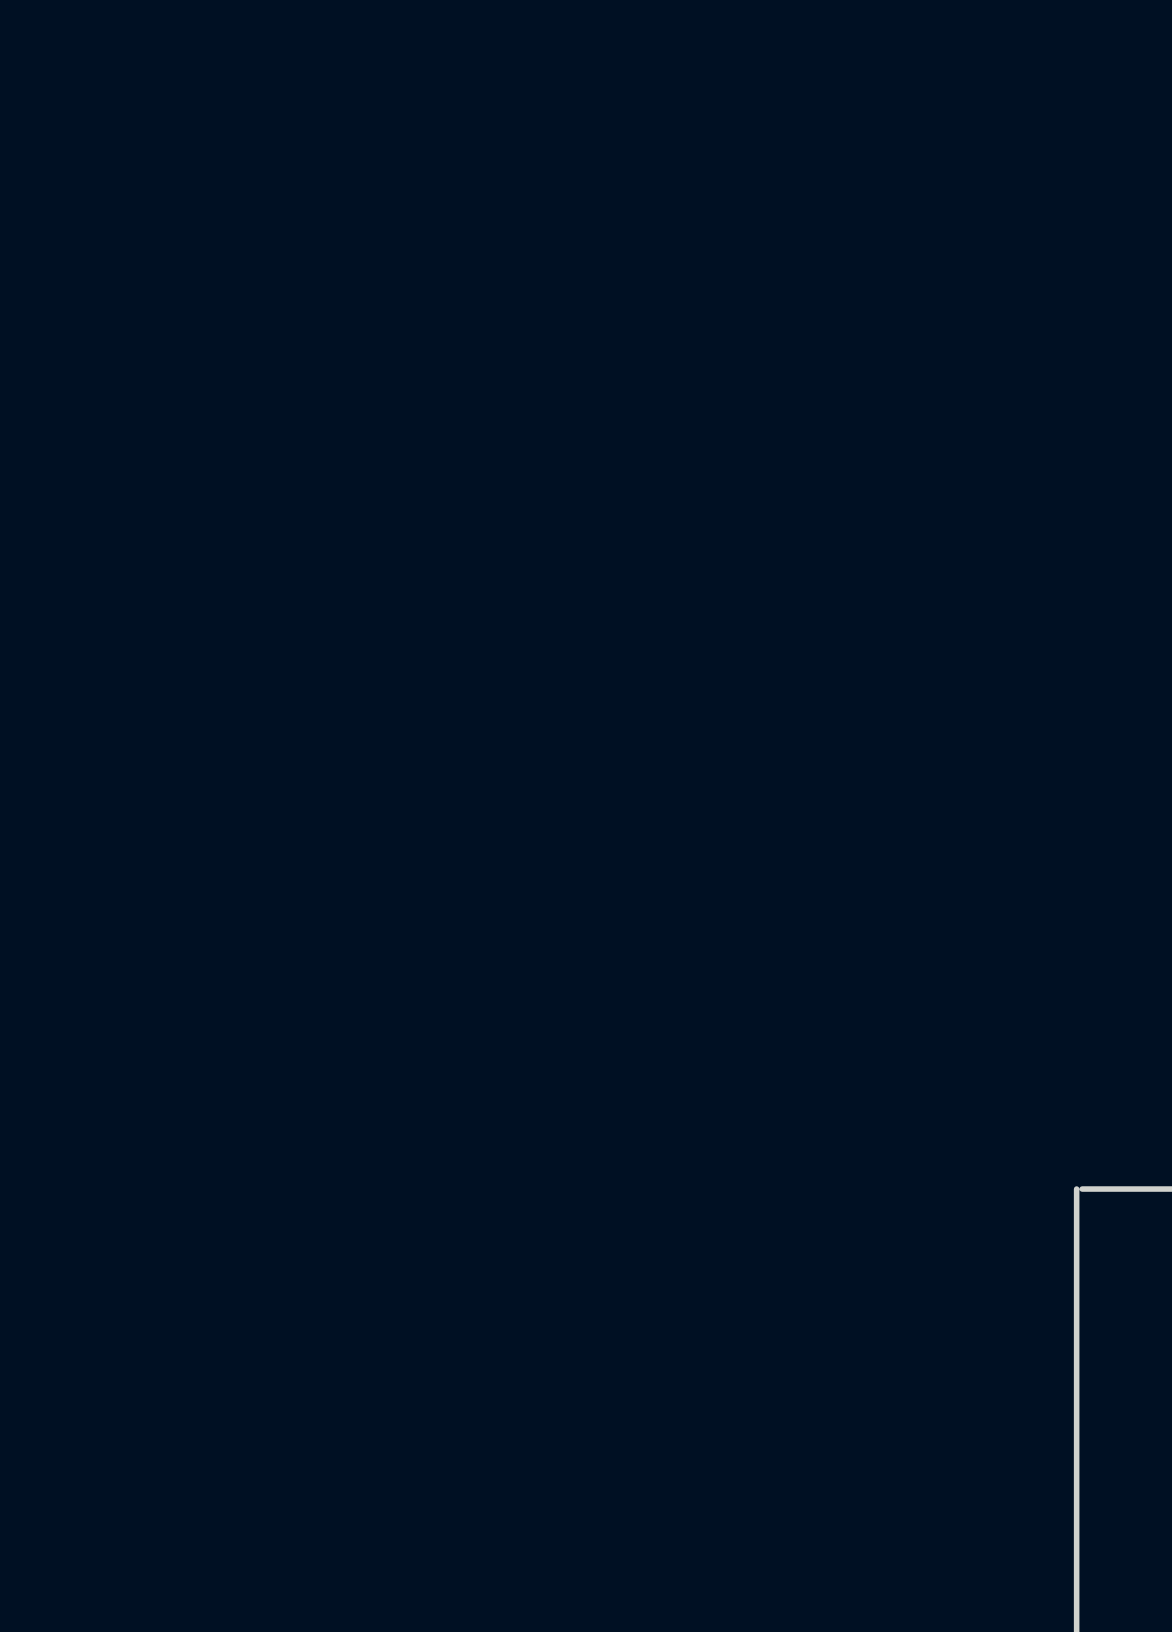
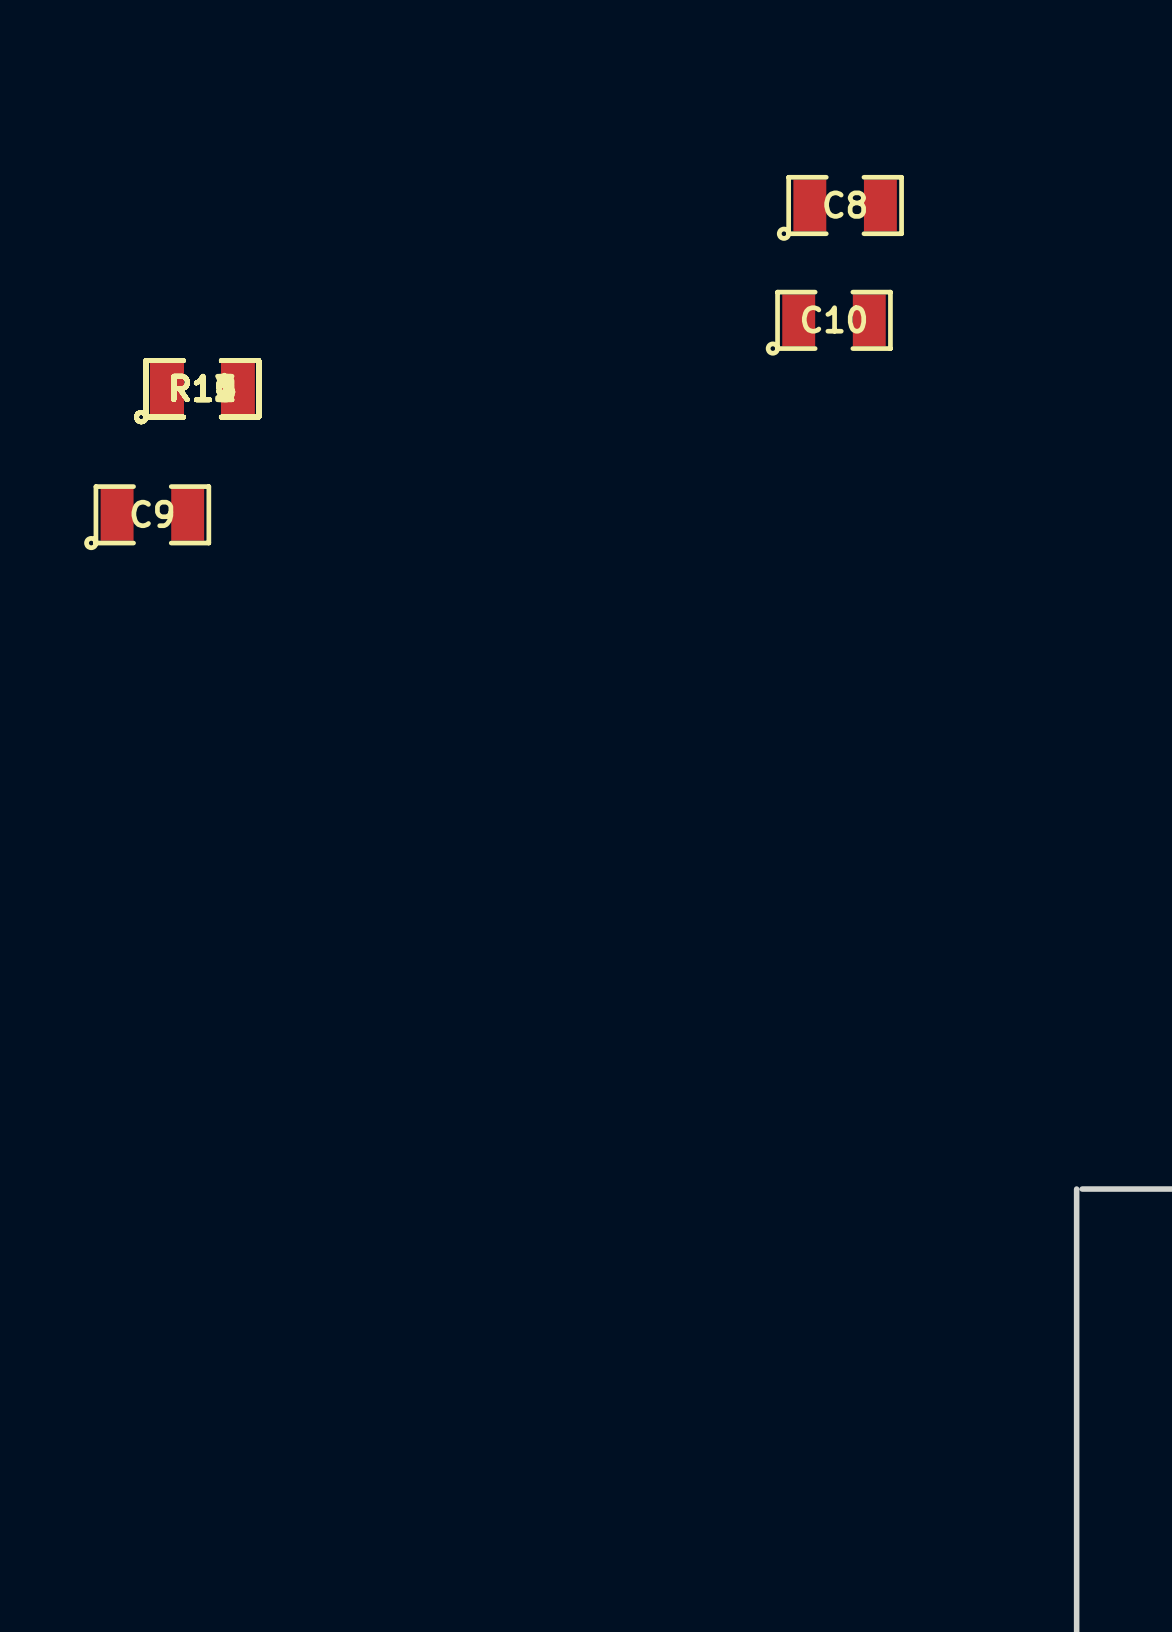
C8: none -> (840, 207)
C10: none -> (829, 322)
part: none -> (197, 391)
part: none -> (197, 391)
part: none -> (197, 391)
part: none -> (197, 391)
part: none -> (197, 391)
part: none -> (197, 391)
C9: none -> (147, 517)

